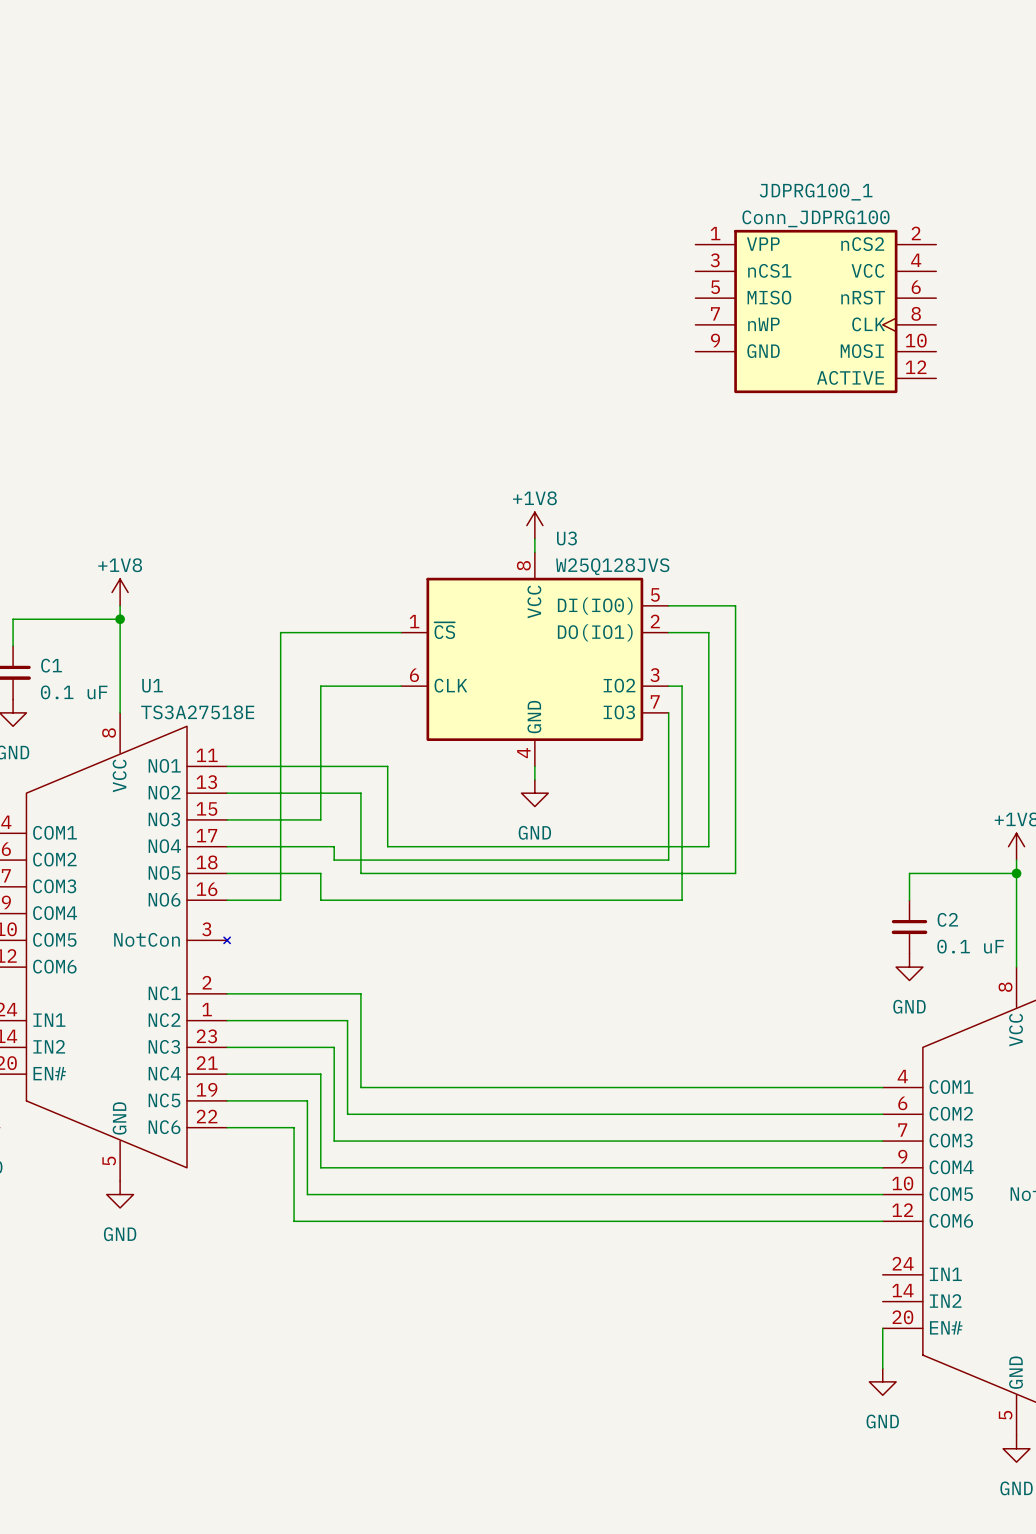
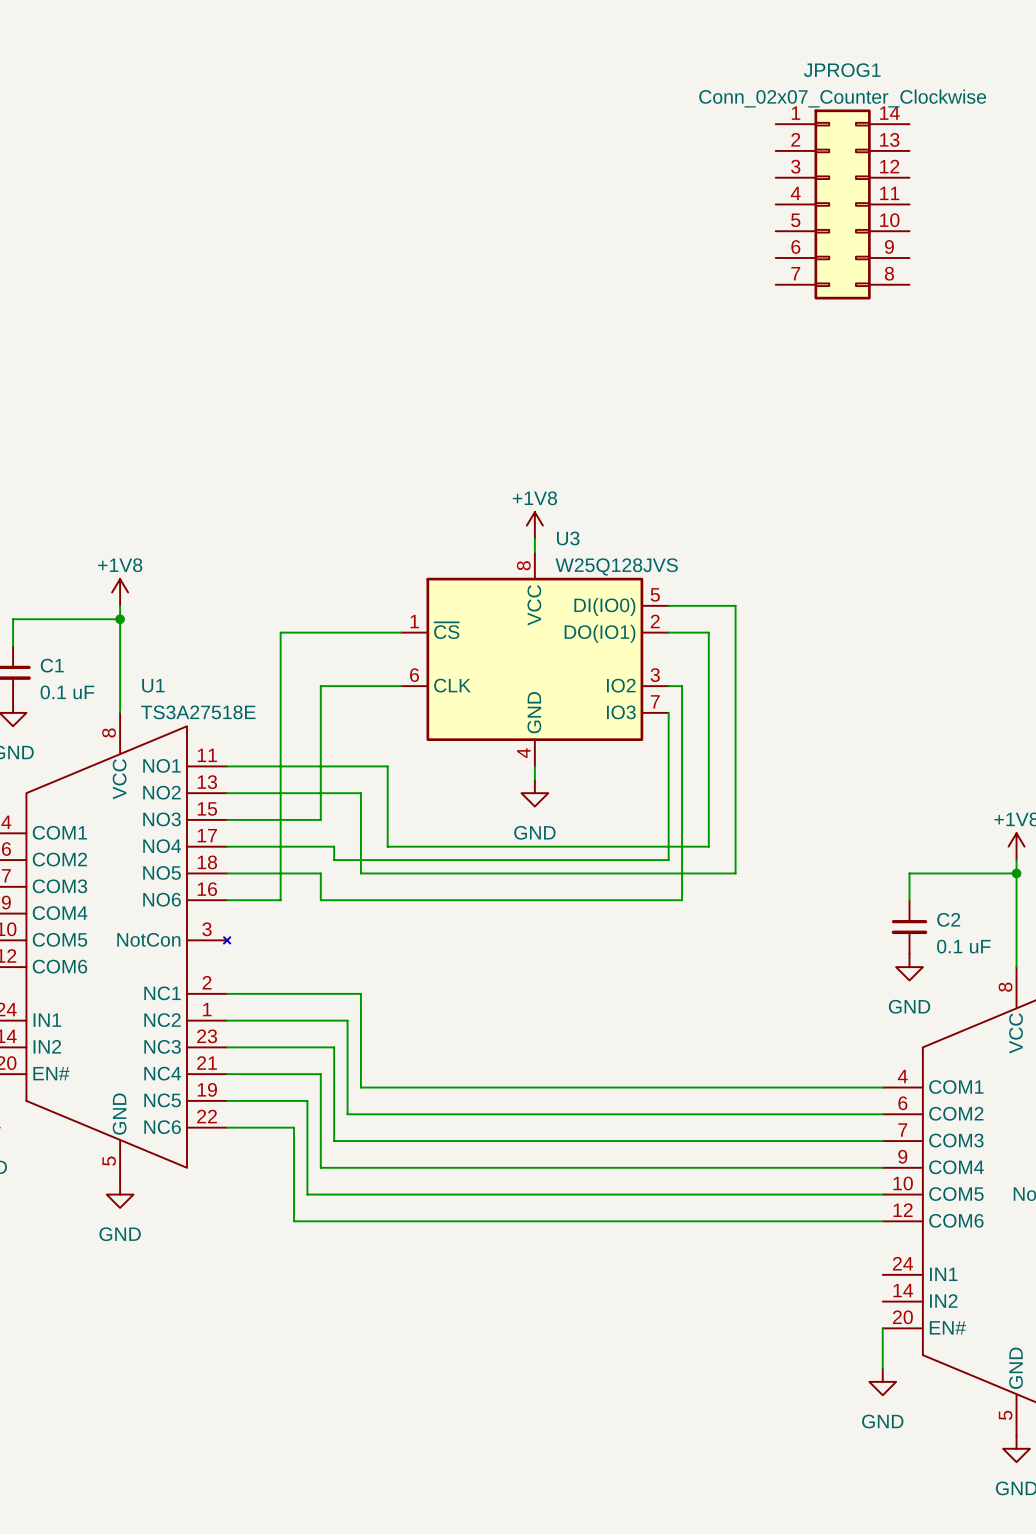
JPROG1: none -> Conn_02x07_Counter_Clockwise (842, 204)
JDPRG100_1: Conn_JDPRG100 (815, 311) -> none

